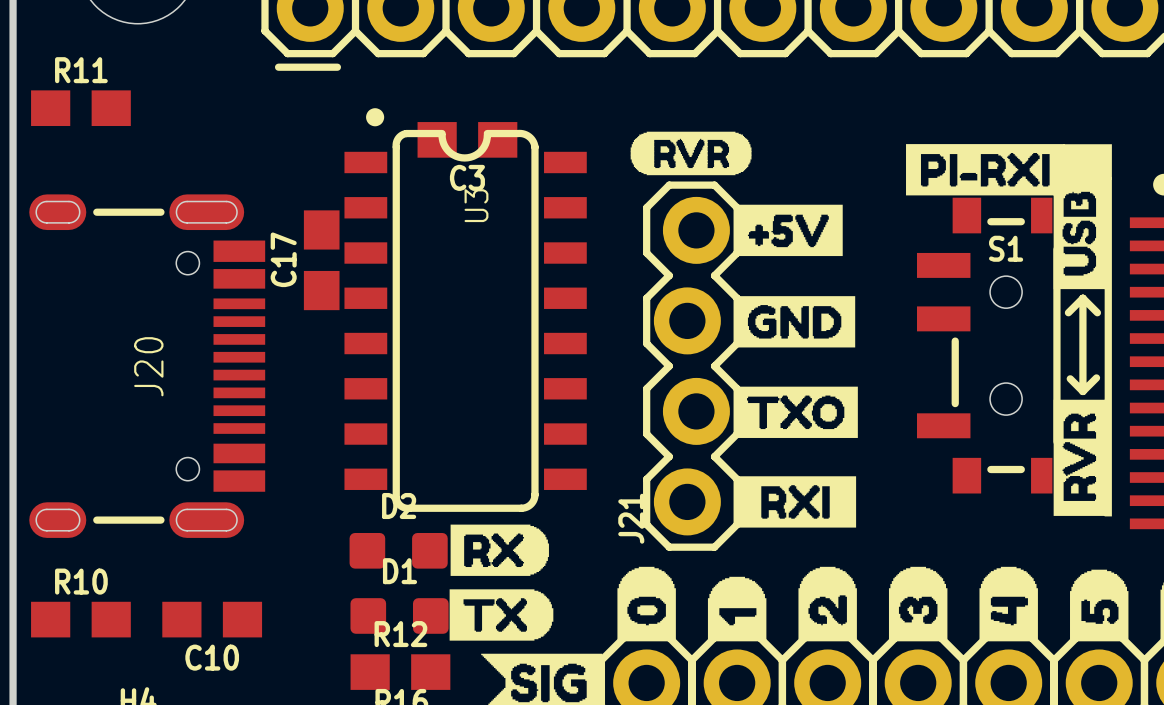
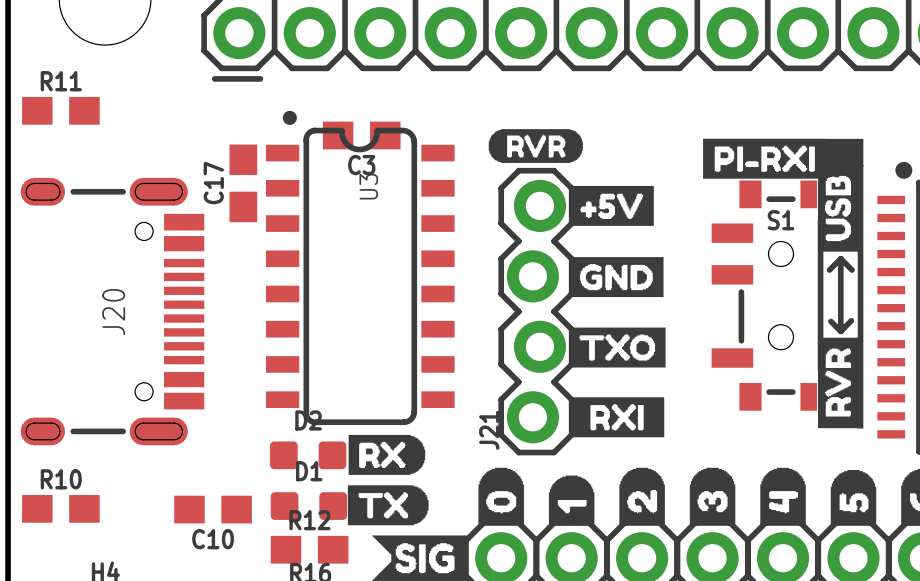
C17 position: (321, 260) -> (243, 183)
C10 position: (212, 619) -> (213, 509)

